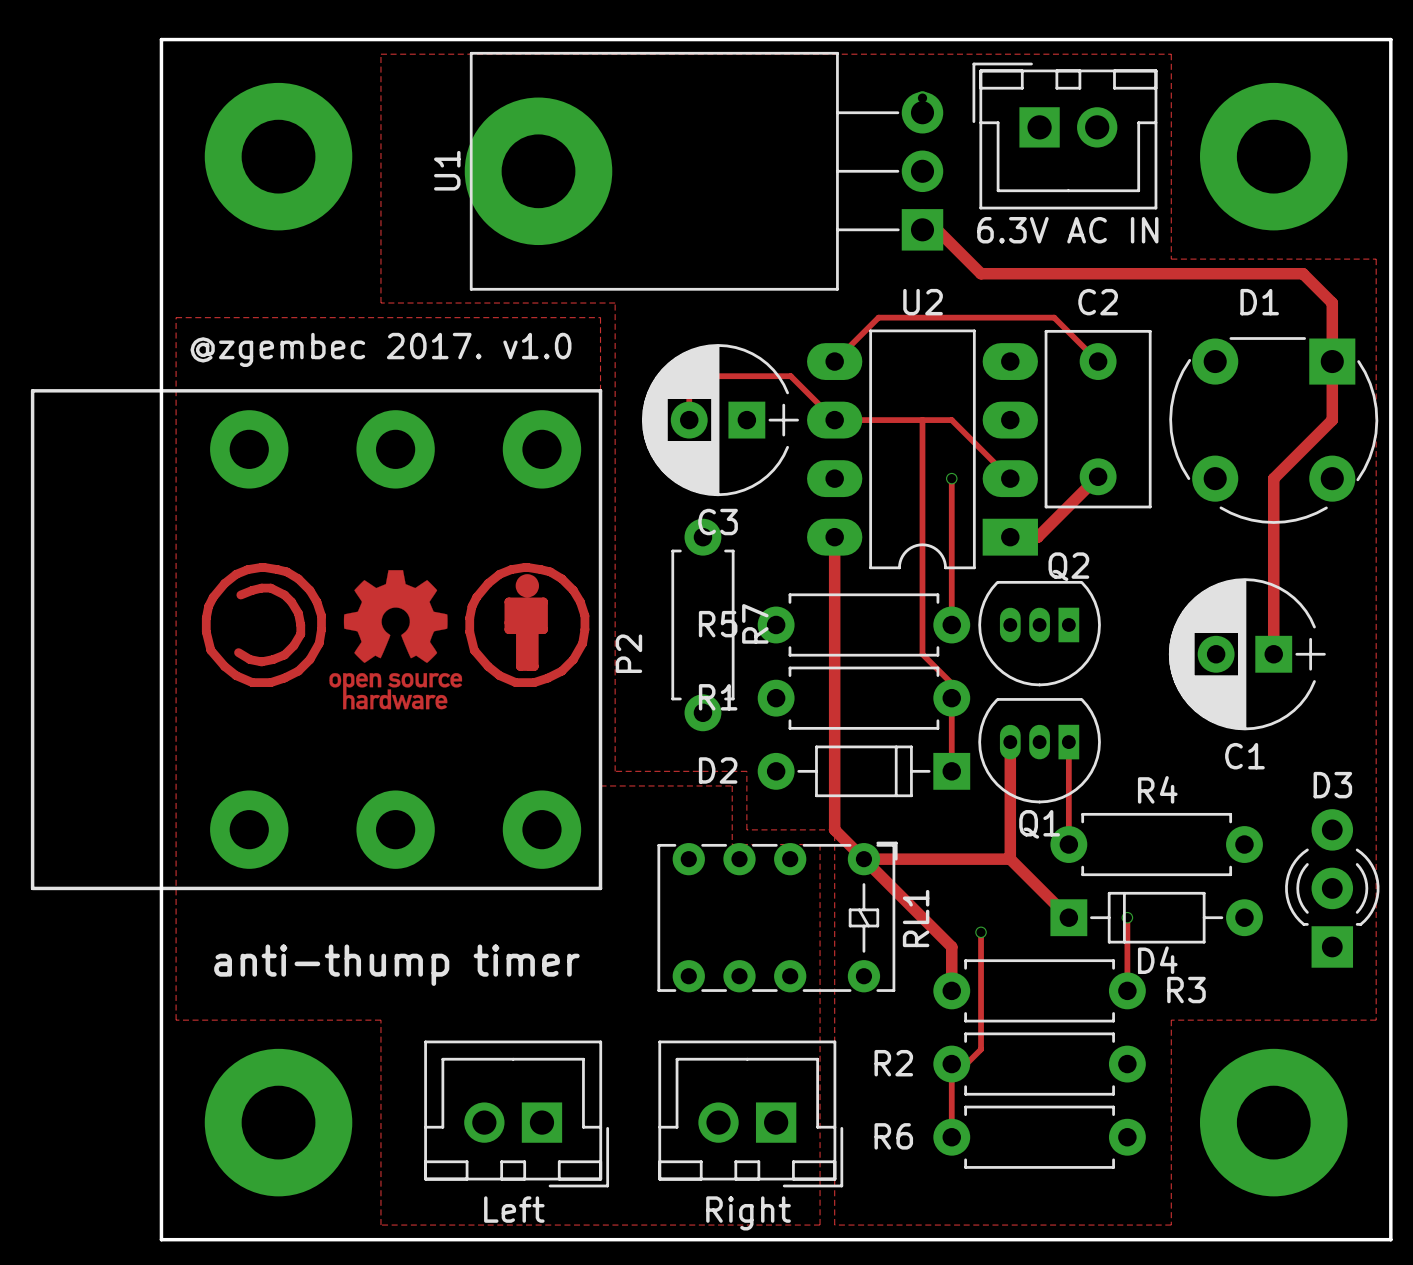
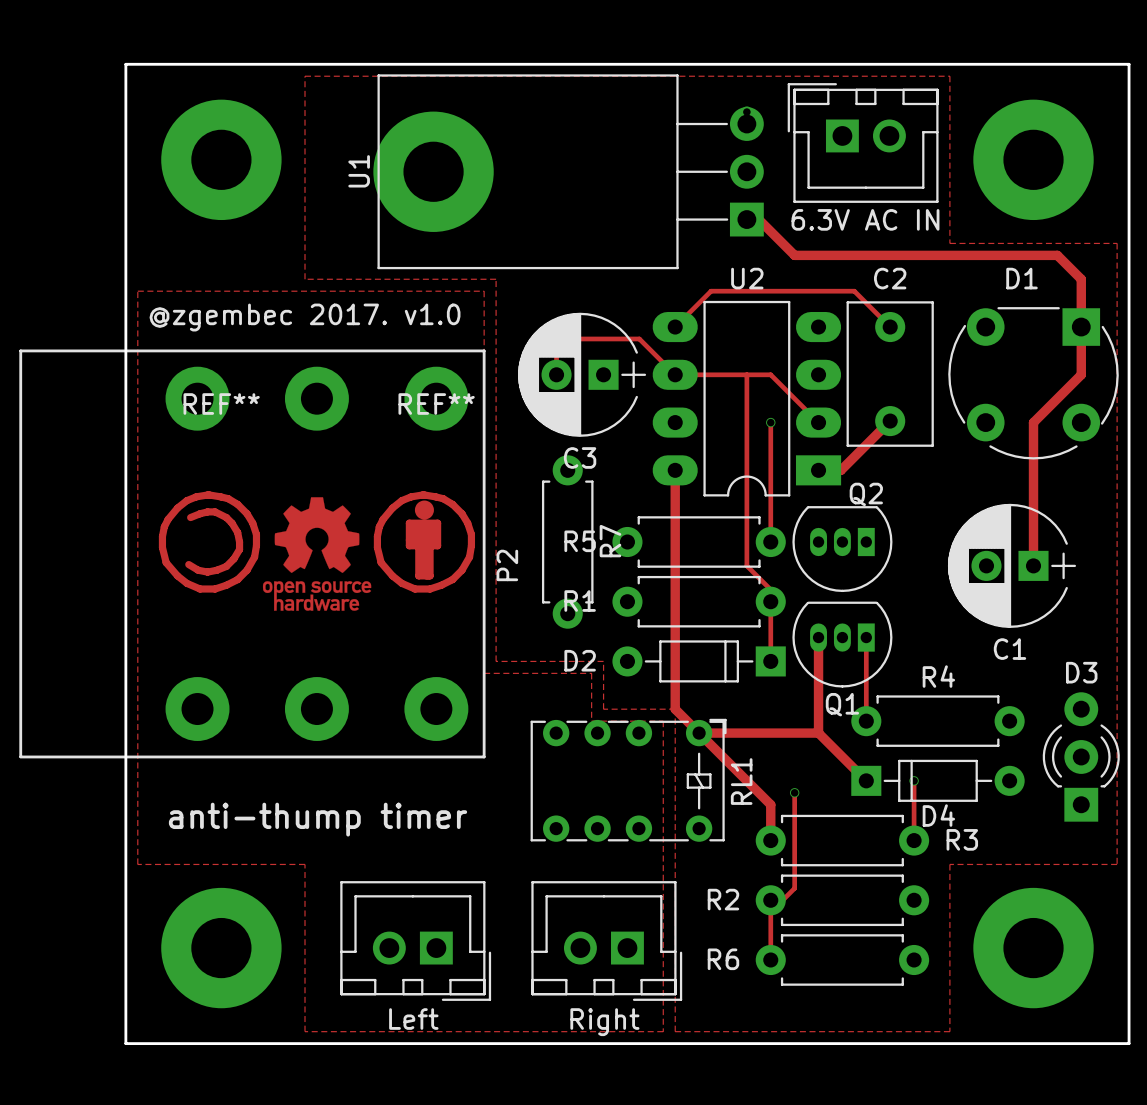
REF**: none -> (209, 542)
REF**: none -> (424, 542)

